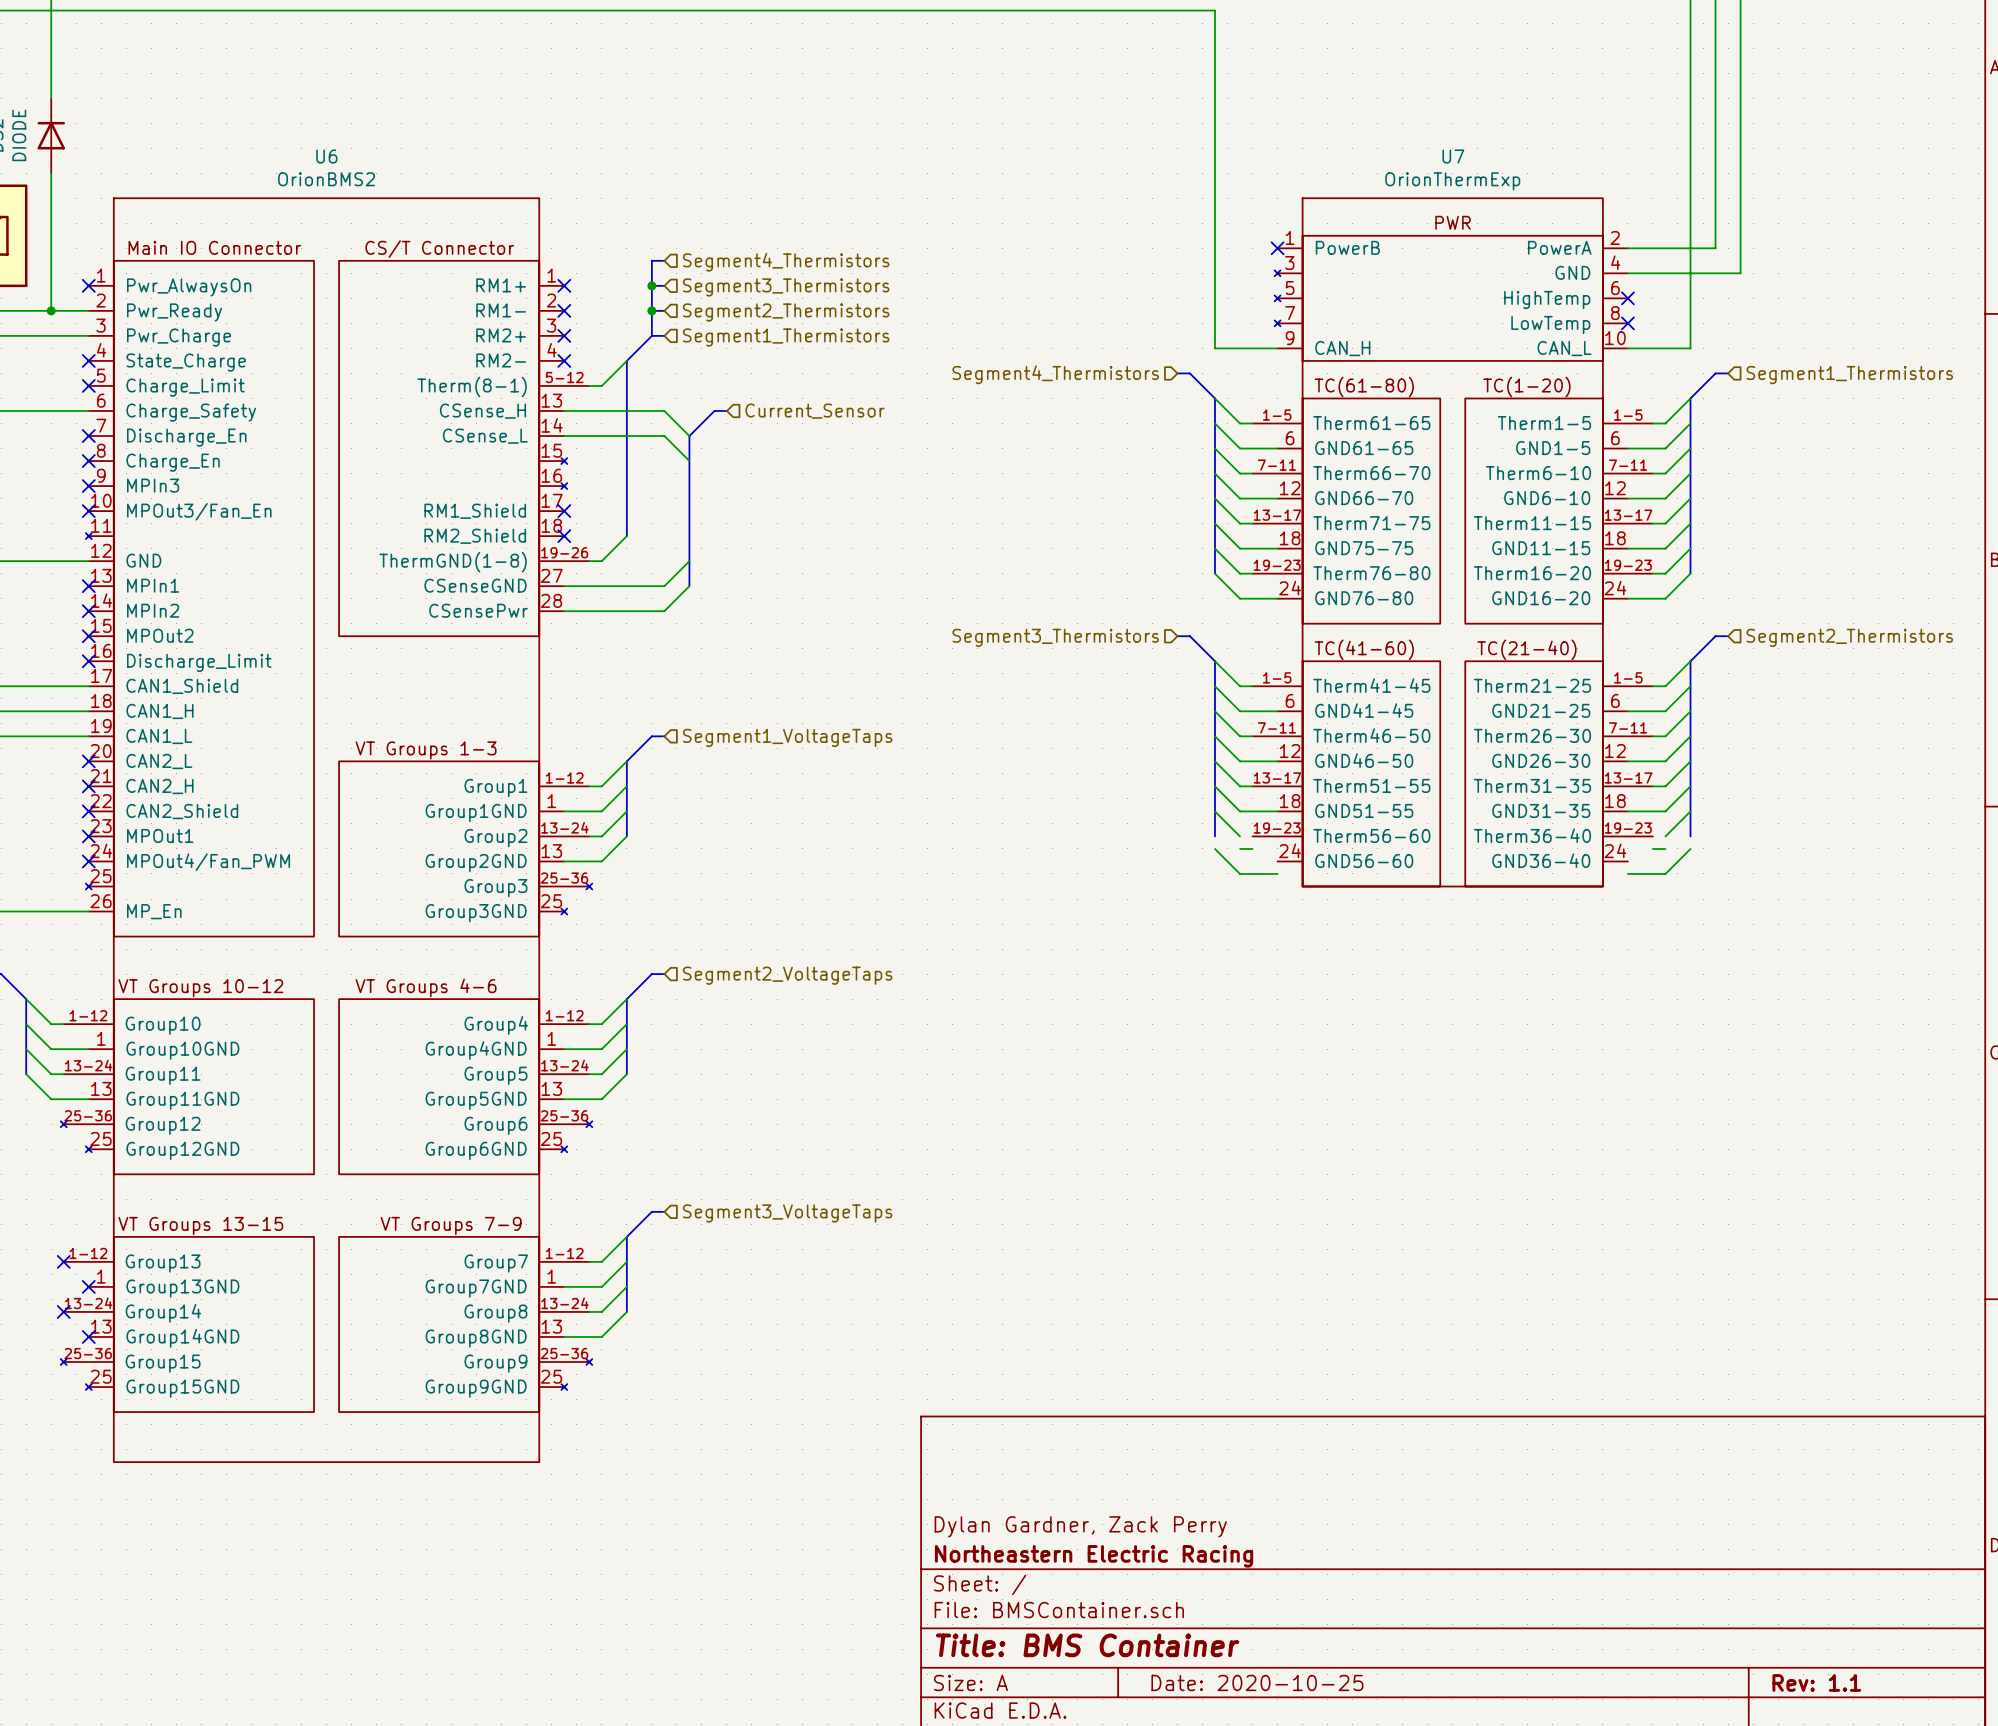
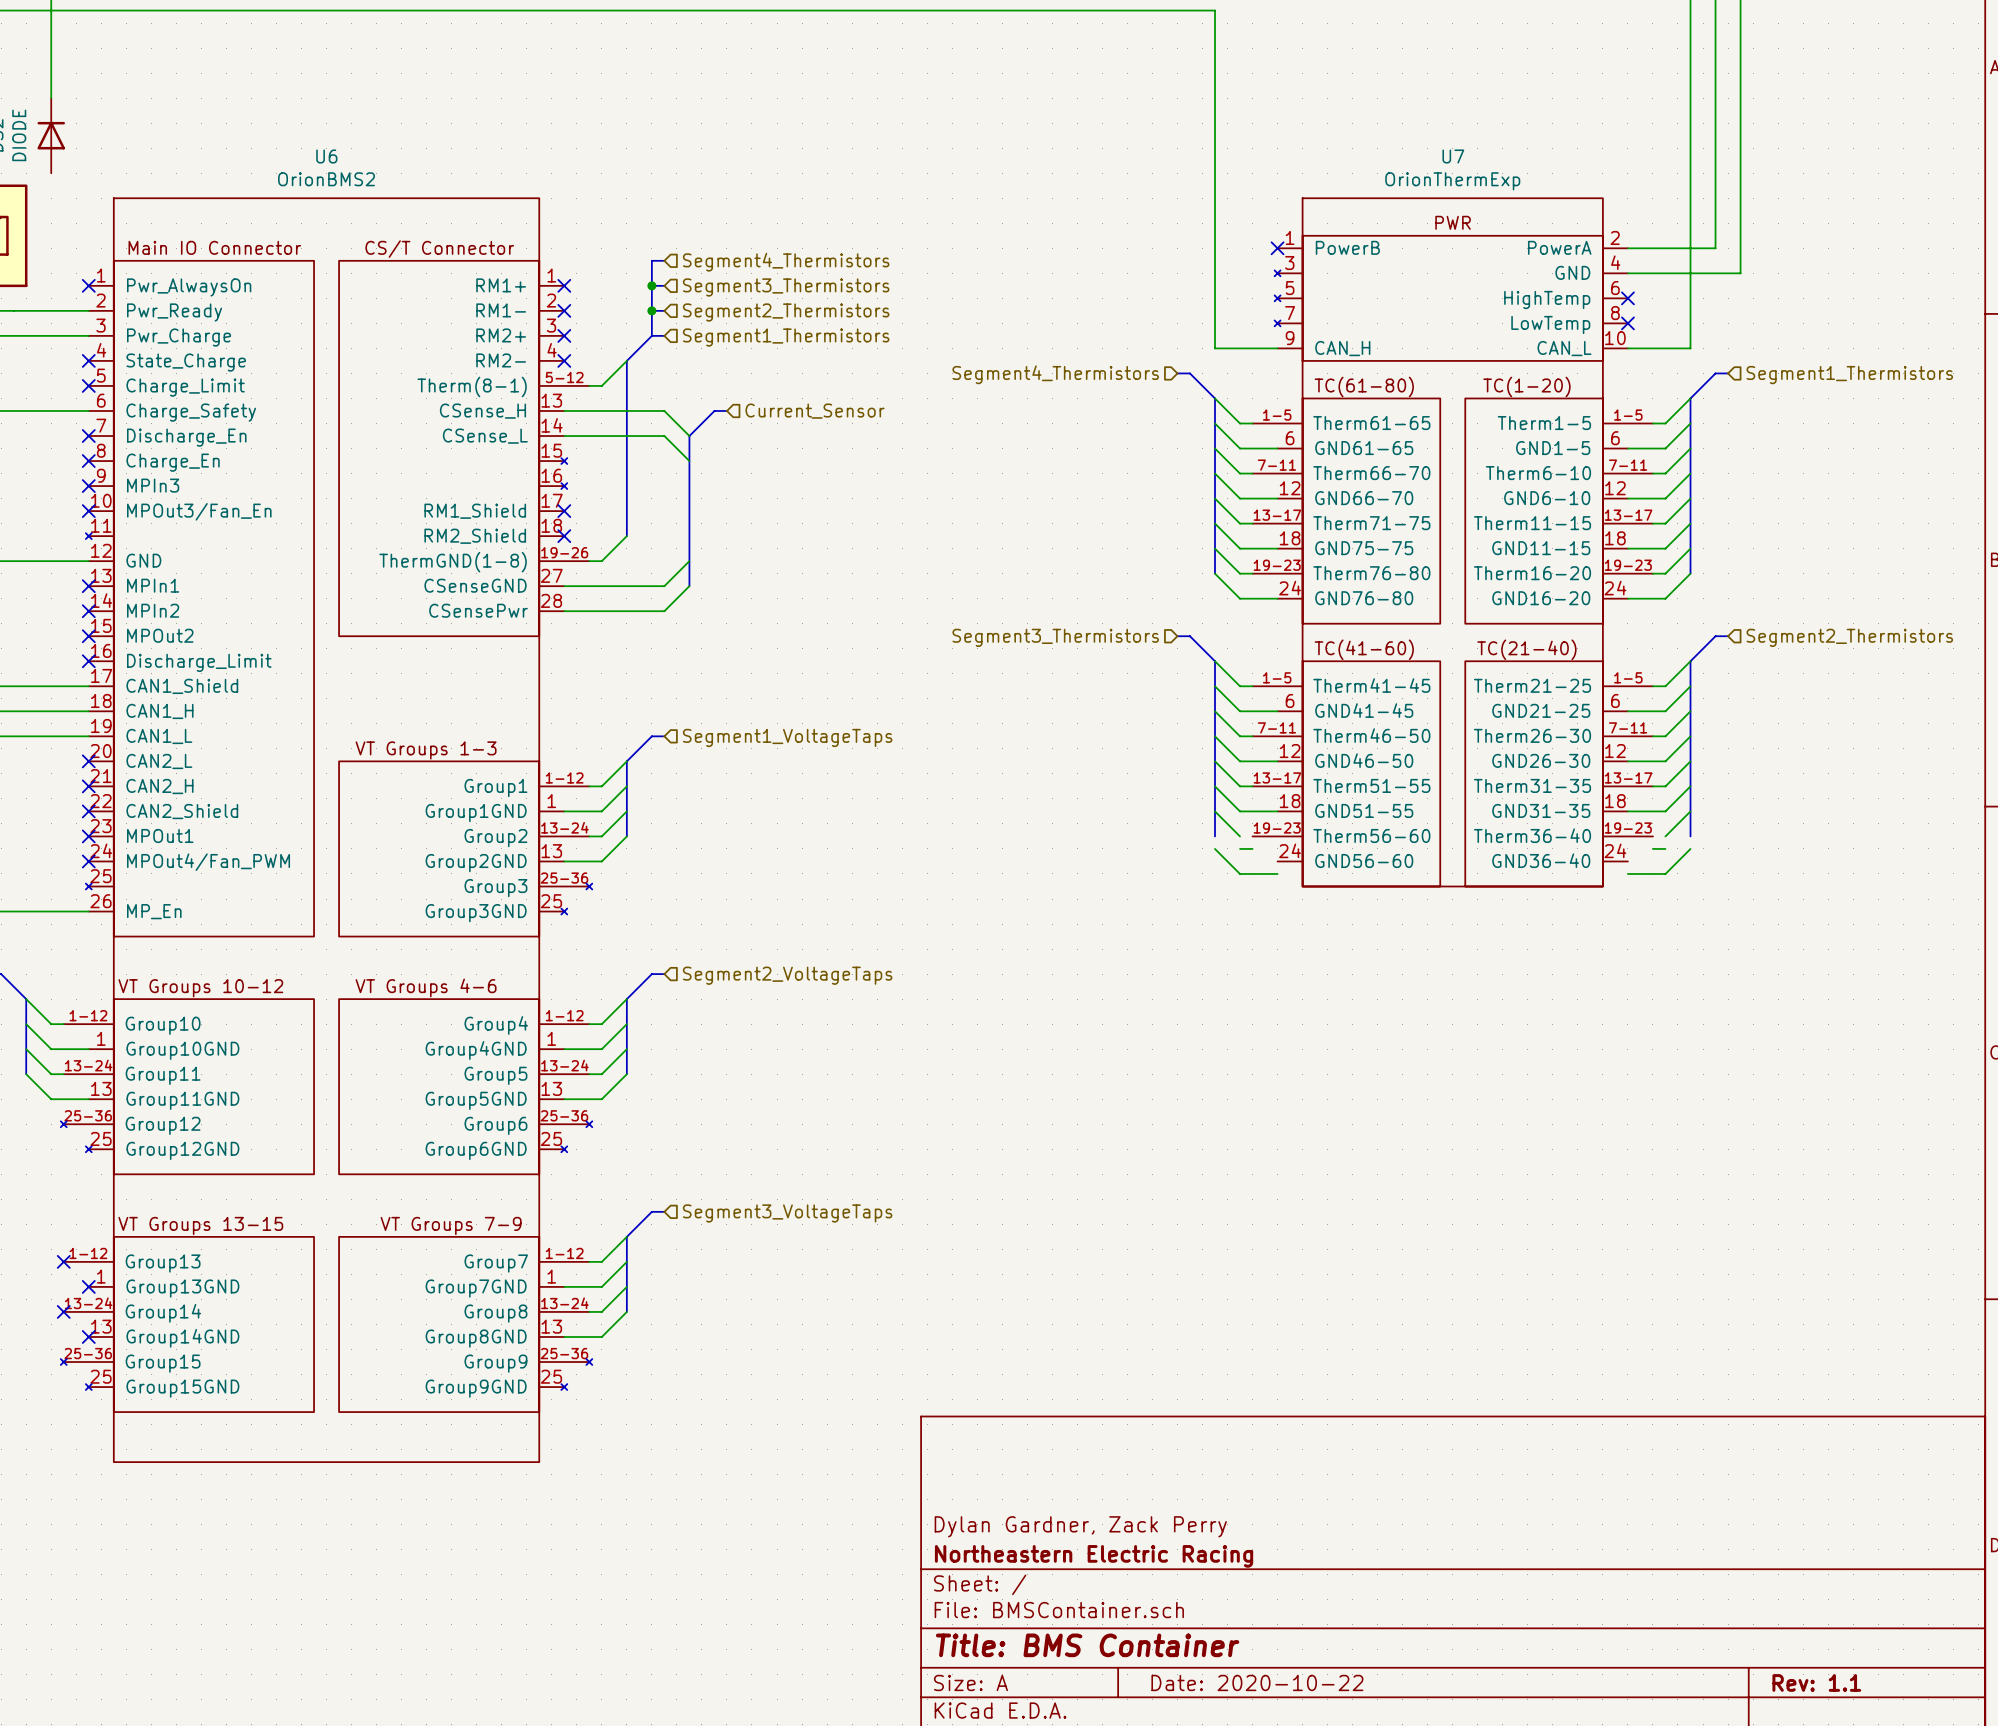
wire: (51, 173) (51, 310) -> none
junction: (51, 310) -> none
title block: Date: 2020-10-25 (1257, 1682) -> Date: 2020-10-22 (1257, 1682)

